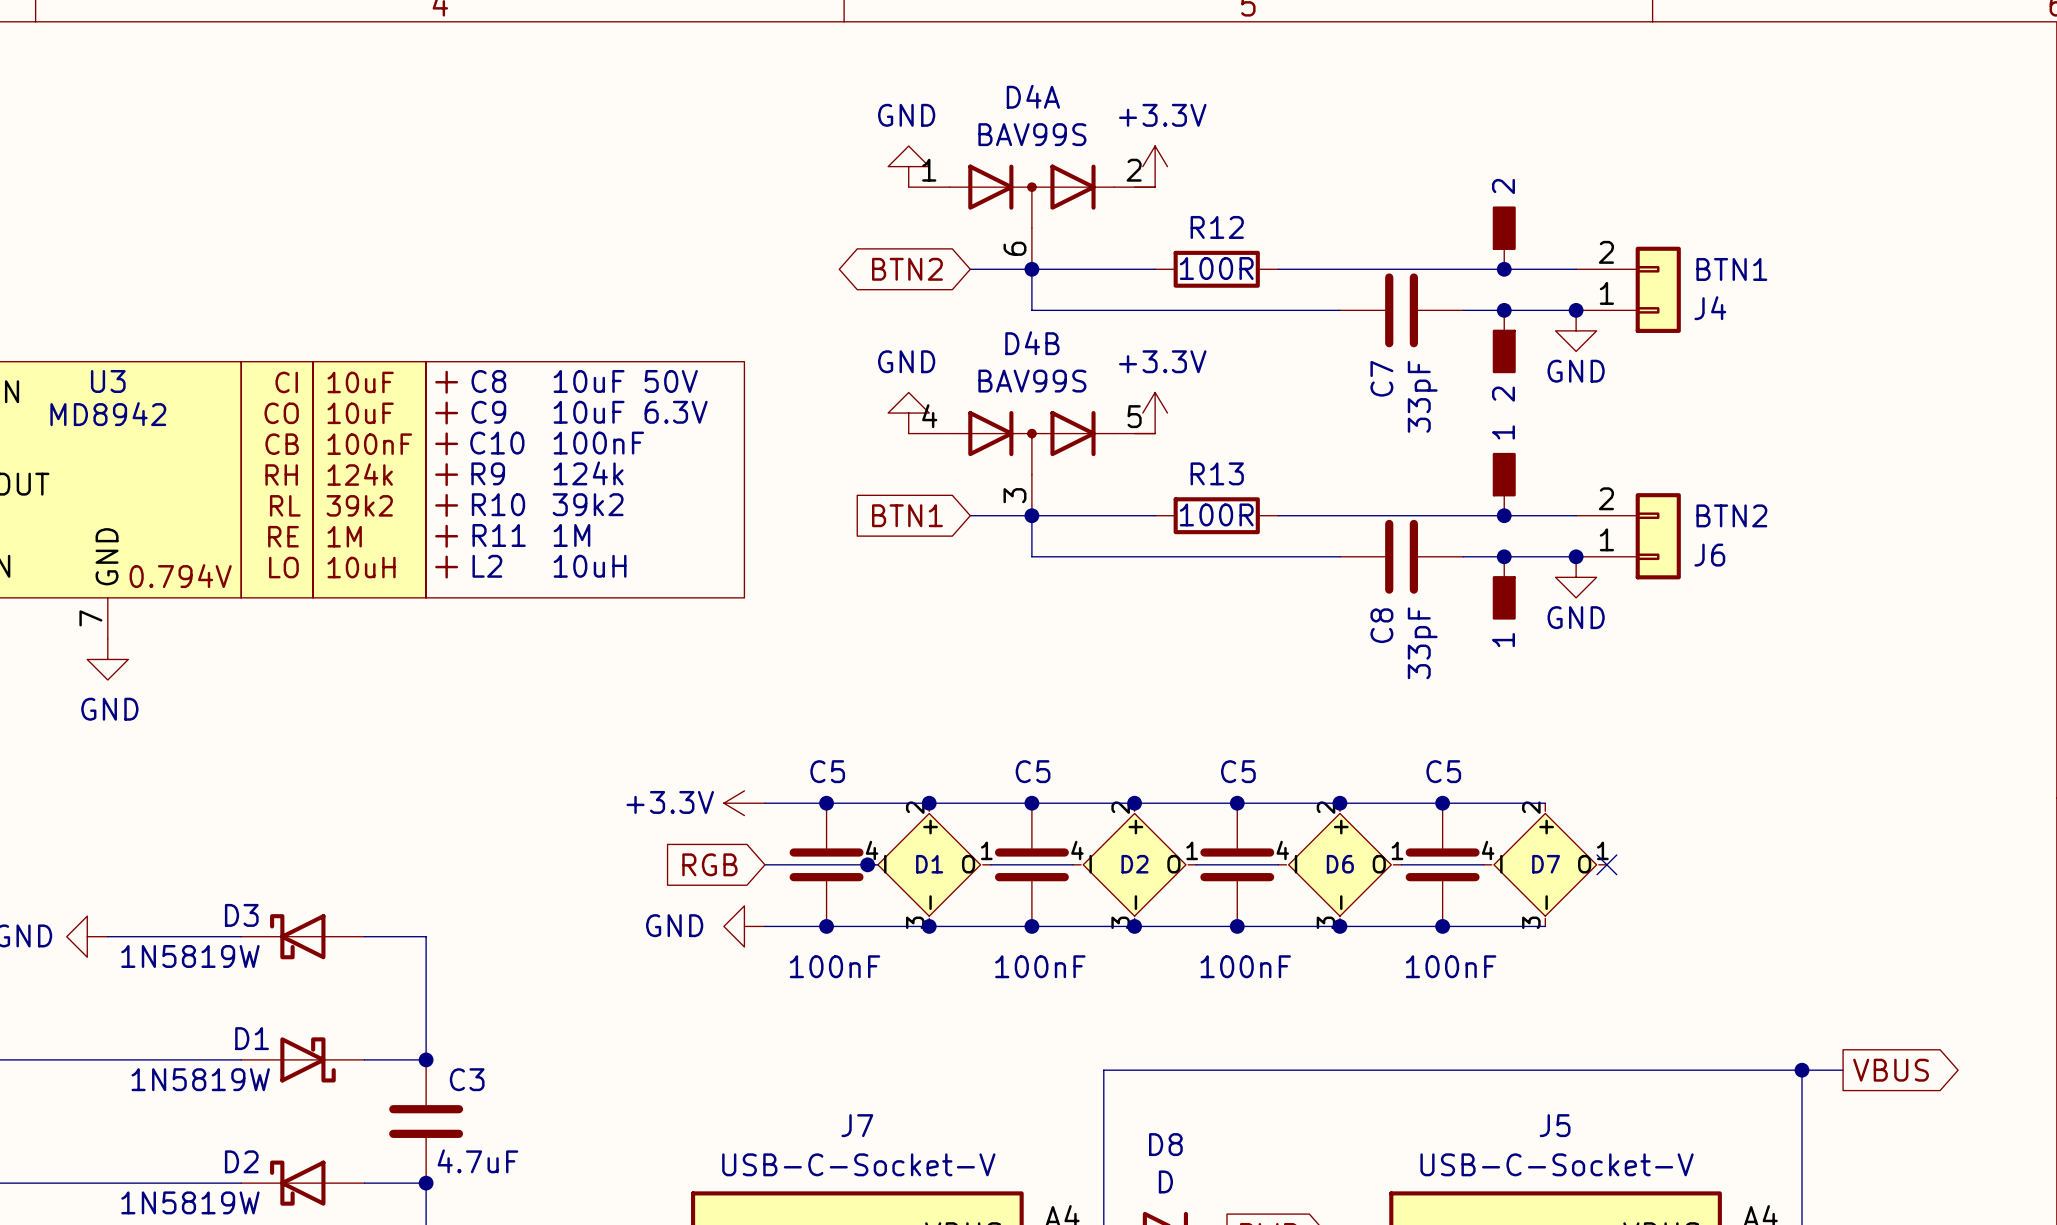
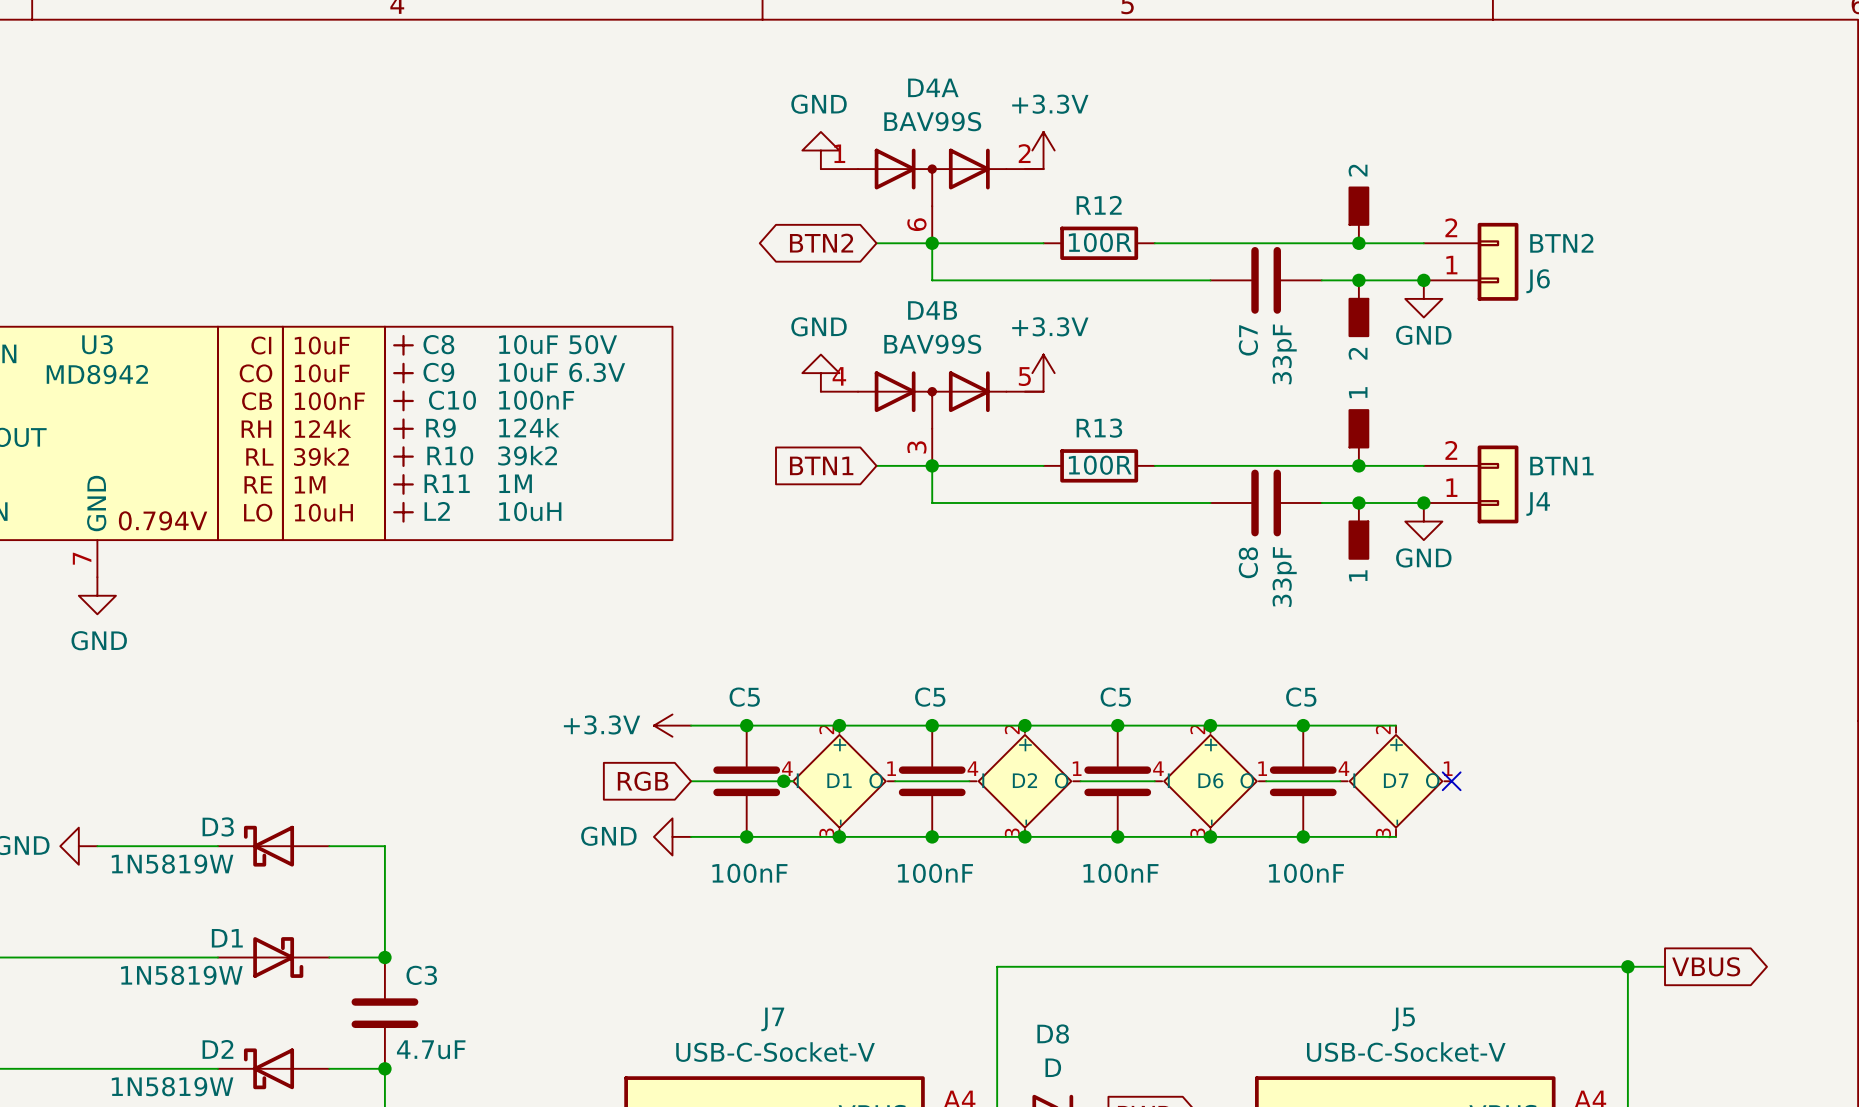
J4 value: BTN1 (1731, 269) -> BTN2 (1561, 243)
J4 name: J4 (1710, 308) -> J6 (1538, 281)
J6 value: BTN2 (1731, 515) -> BTN1 (1561, 466)
J6 name: J6 (1709, 555) -> J4 (1538, 504)

